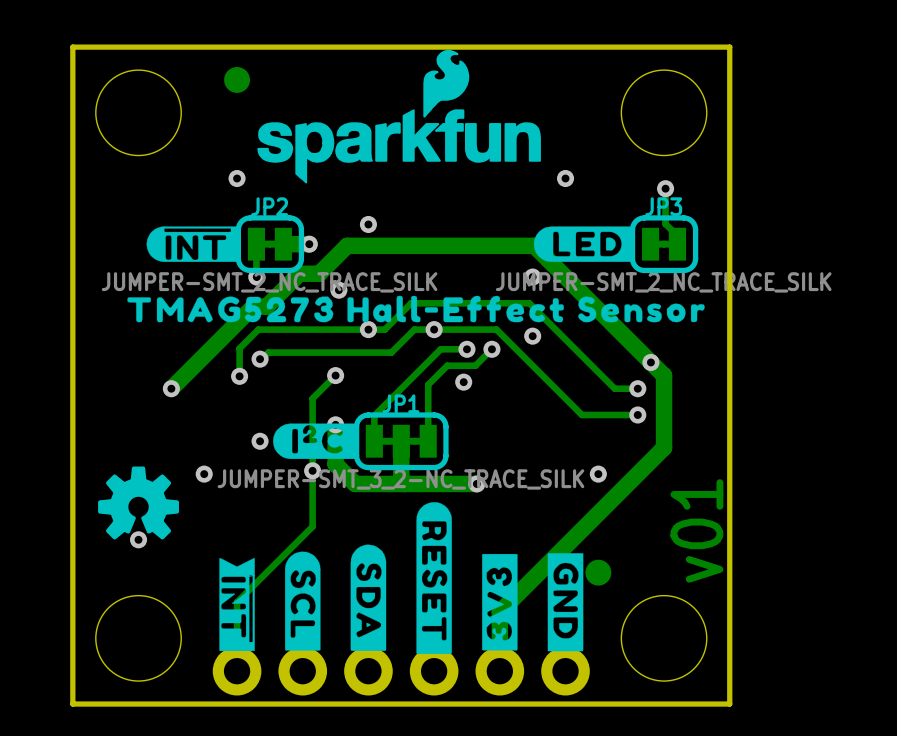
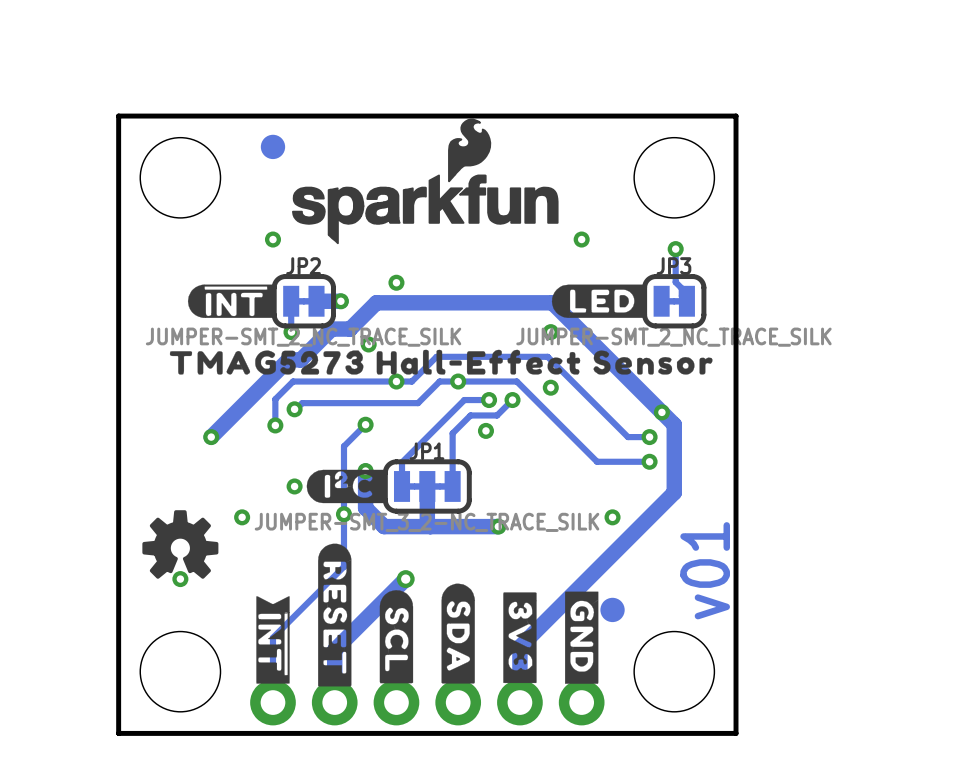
track: none -> (405, 579) (334, 650) (334, 702)
via: none -> (405, 579)
drawing shape: [482, 553, 518, 651] -> [503, 592, 537, 684]
drawing position: (434, 578) -> (334, 615)
drawing position: (368, 597) -> (458, 633)
drawing position: (302, 601) -> (396, 636)

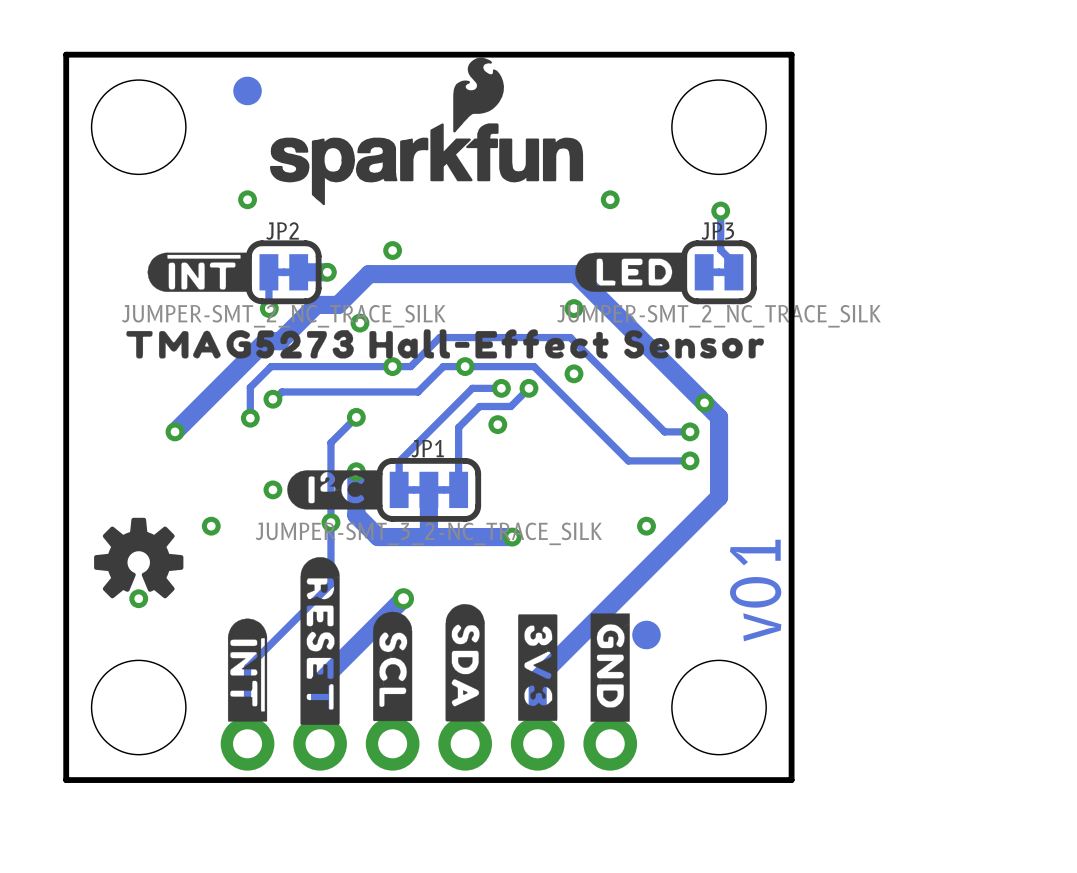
drawing shape: [256, 596, 290, 684] -> [227, 618, 268, 722]

